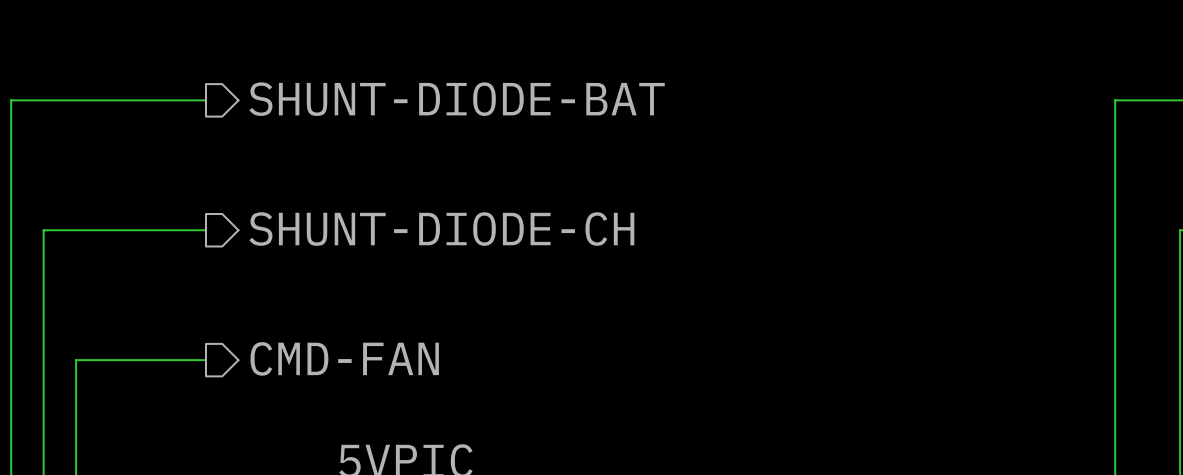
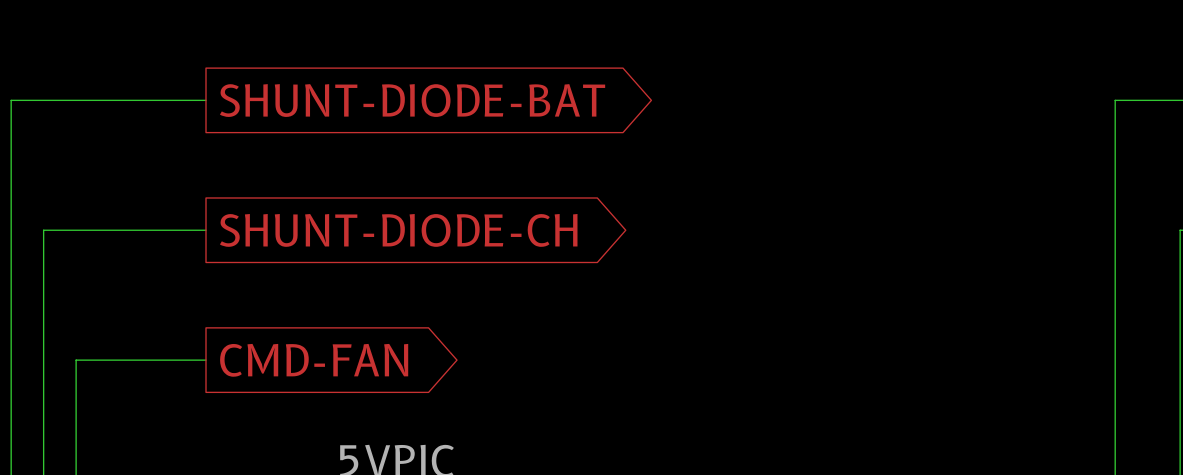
hierarchical label: SHUNT-DIODE-BAT (457, 99) -> none
global label: none -> SHUNT-DIODE-BAT (412, 100)
hierarchical label: SHUNT-DIODE-CH (441, 229) -> none
global label: none -> SHUNT-DIODE-CH (398, 230)
hierarchical label: CMD-FAN (344, 358) -> none
global label: none -> CMD-FAN (314, 360)

